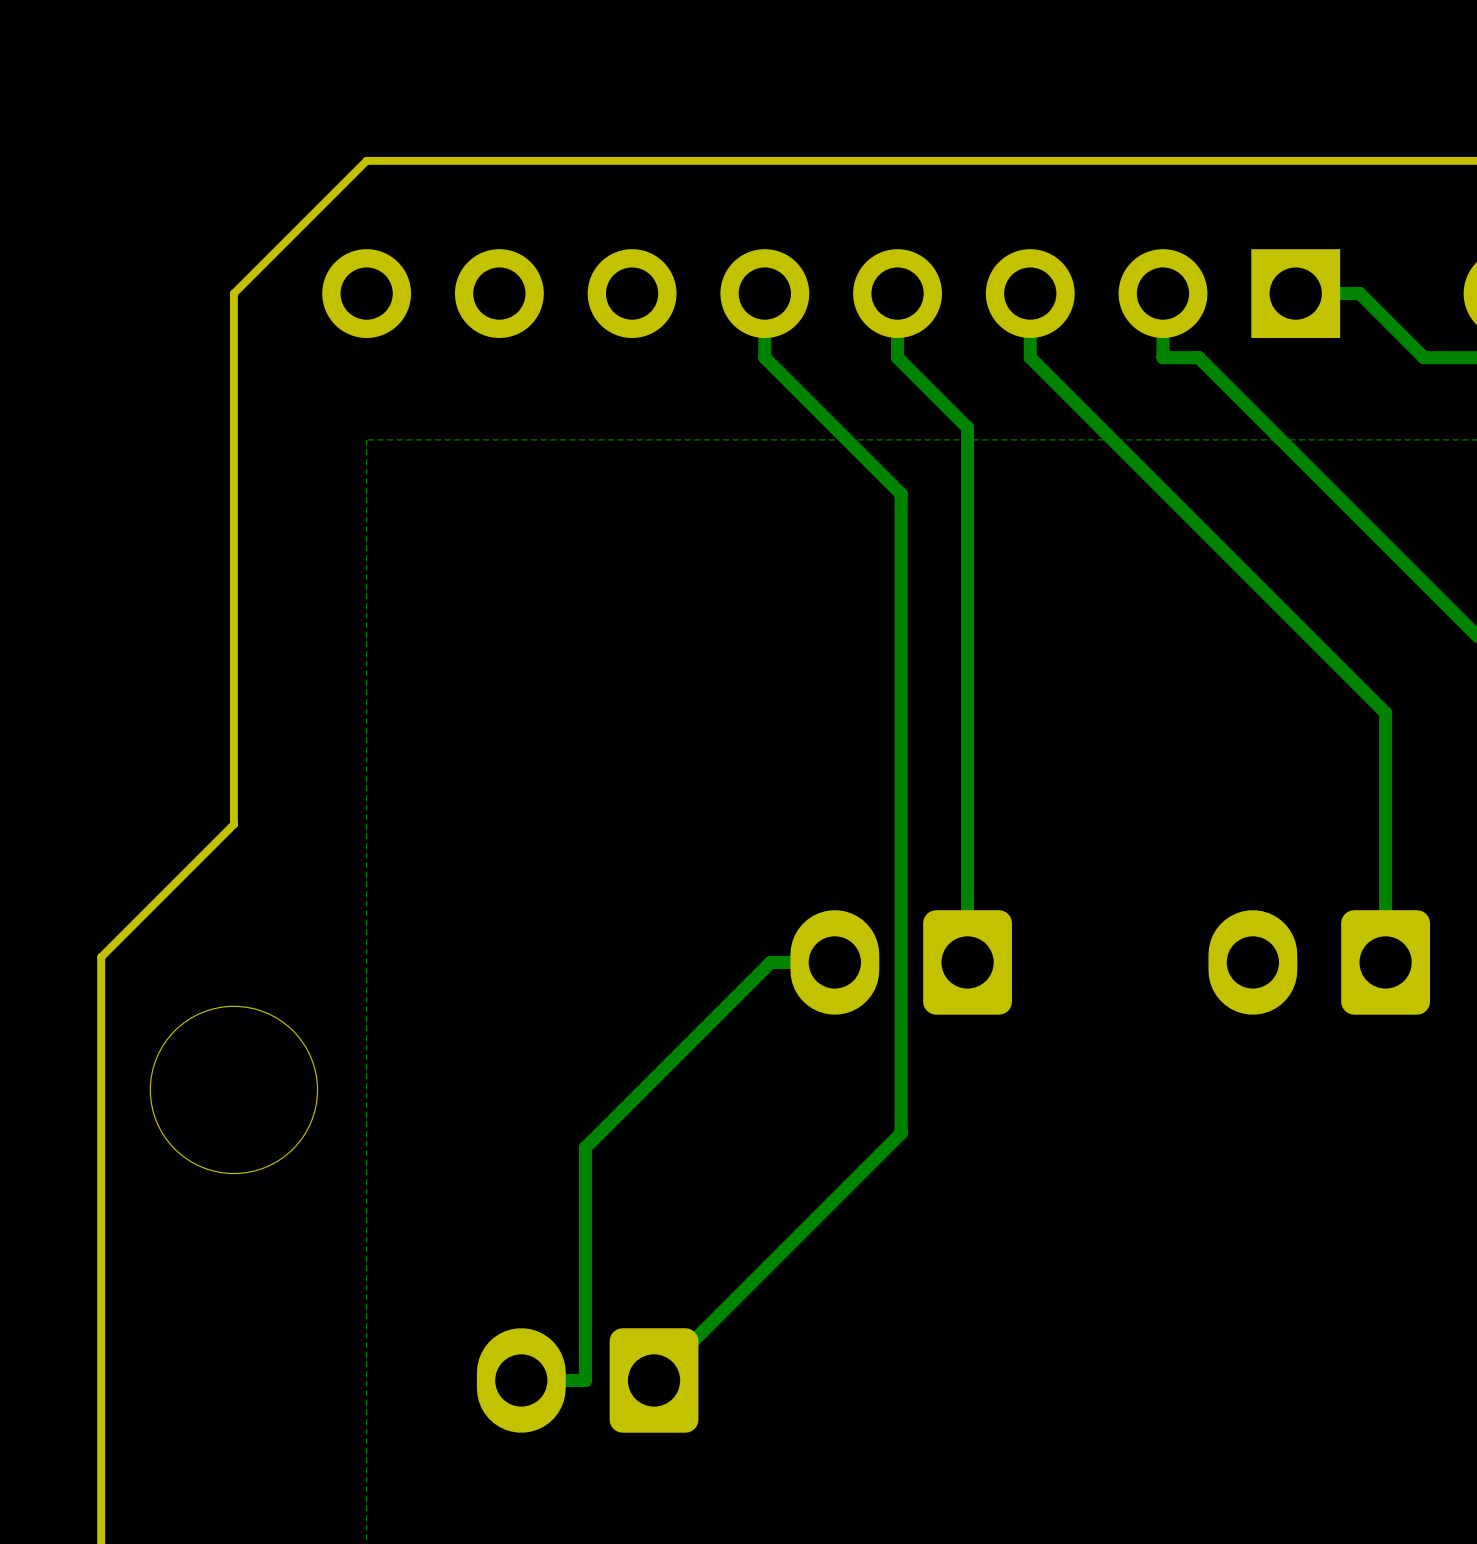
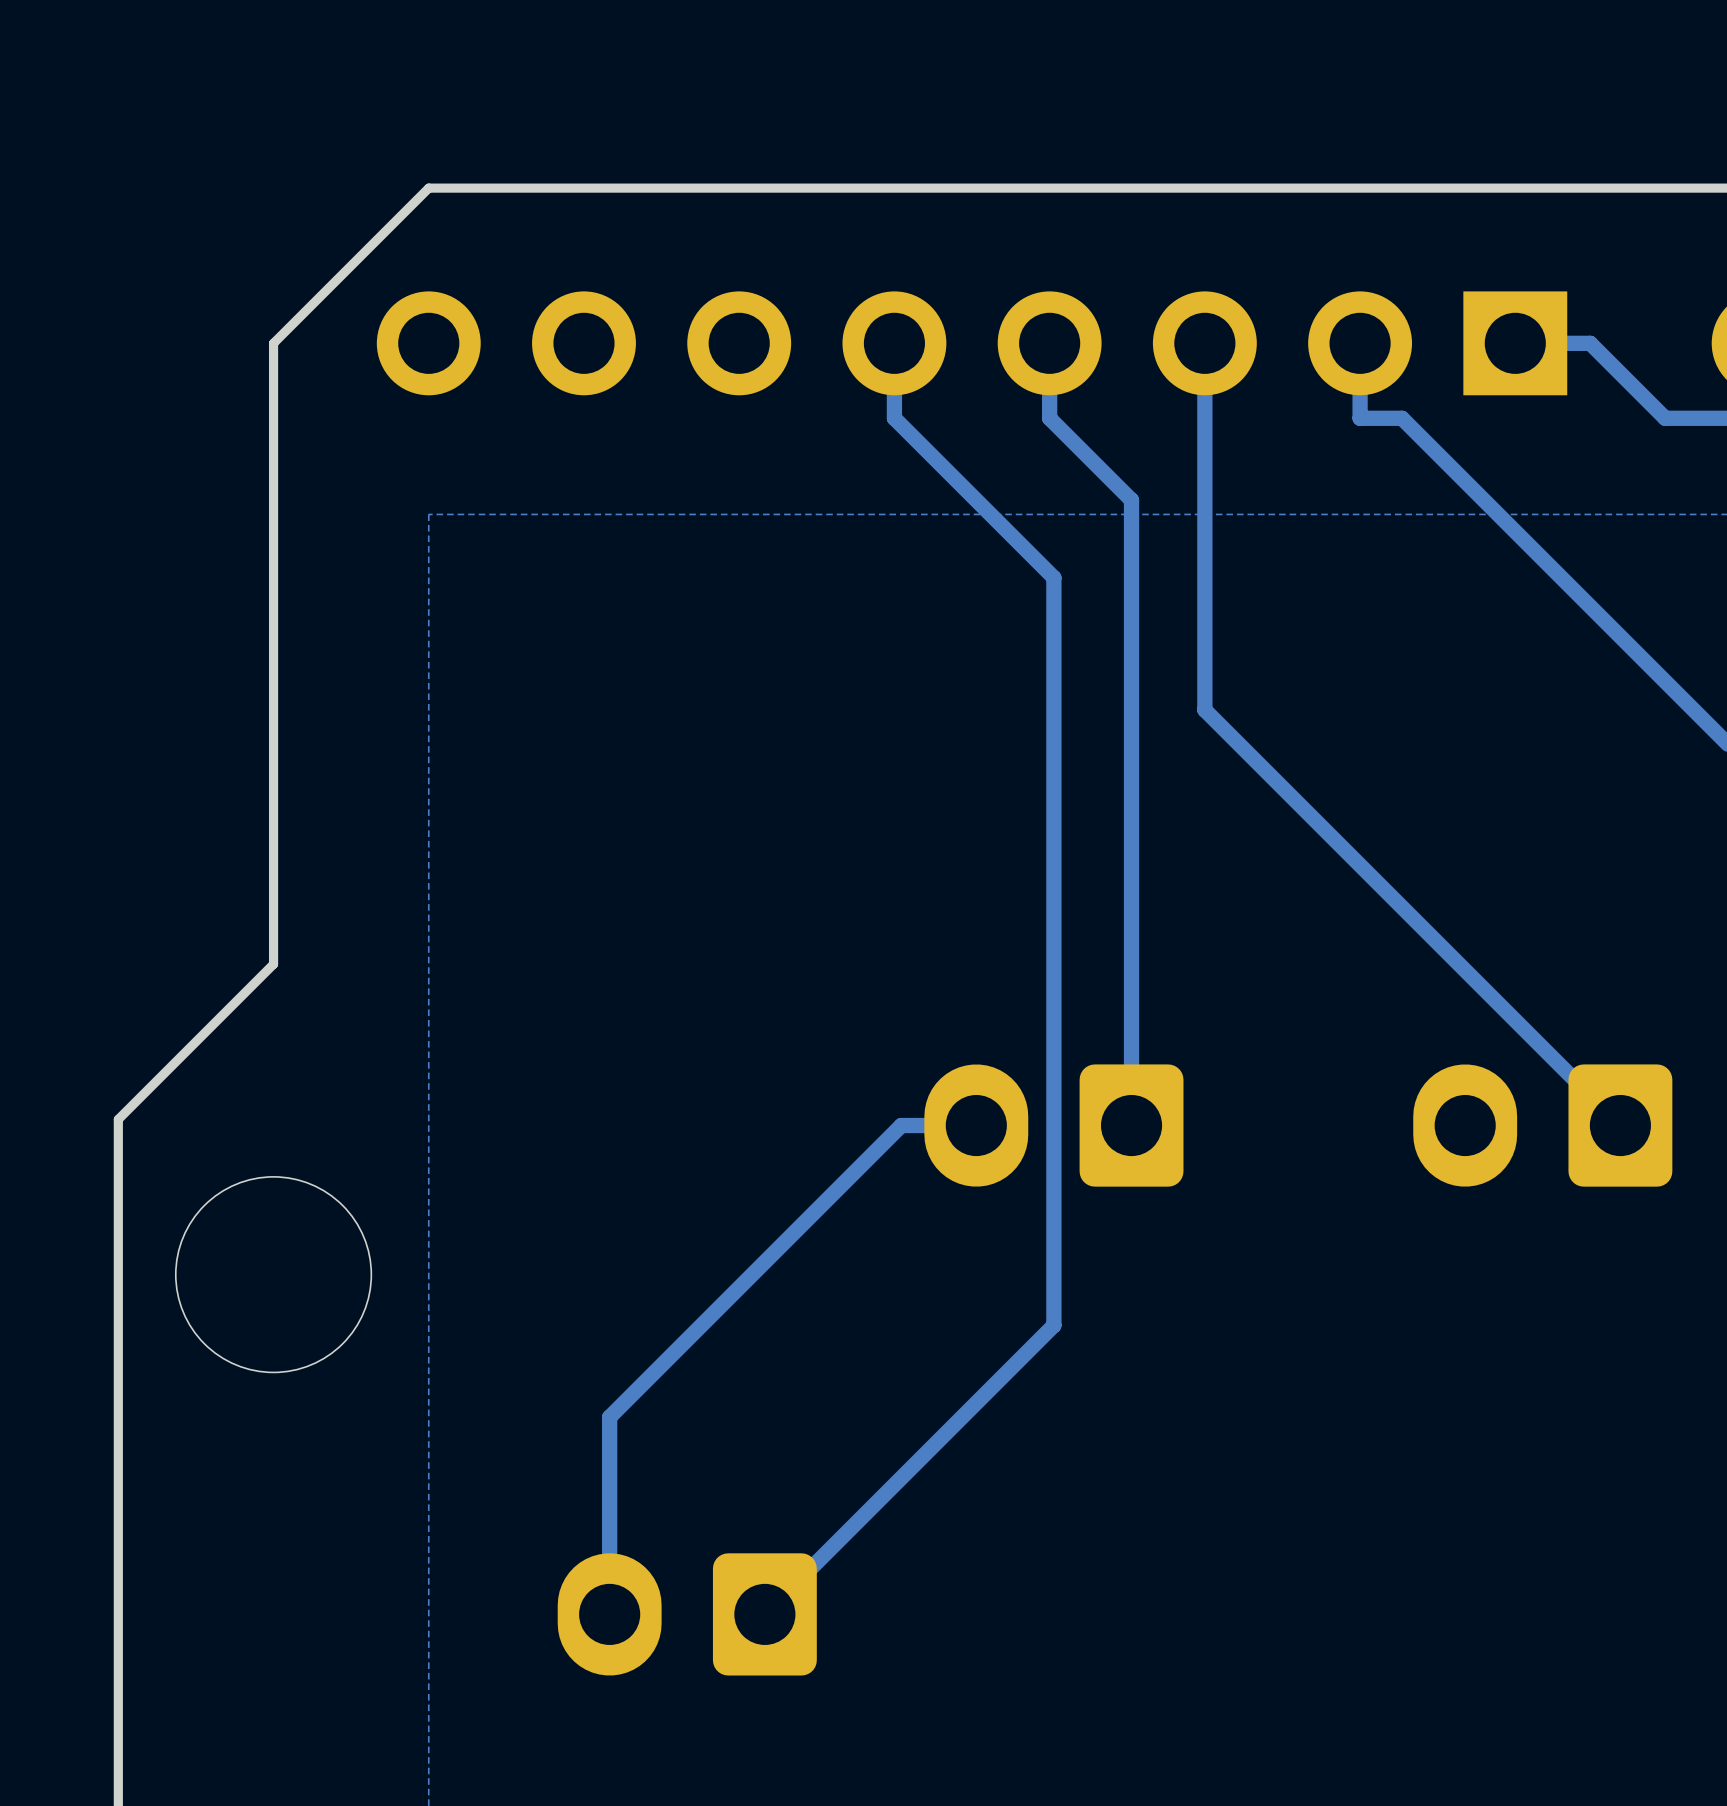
track: (1030, 357) (1385, 713) (1385, 962) -> (1204, 418) (1204, 709) (1620, 1125)
track: (585, 1147) (585, 1380) (521, 1380) -> (684, 1342) (609, 1417) (609, 1614)

